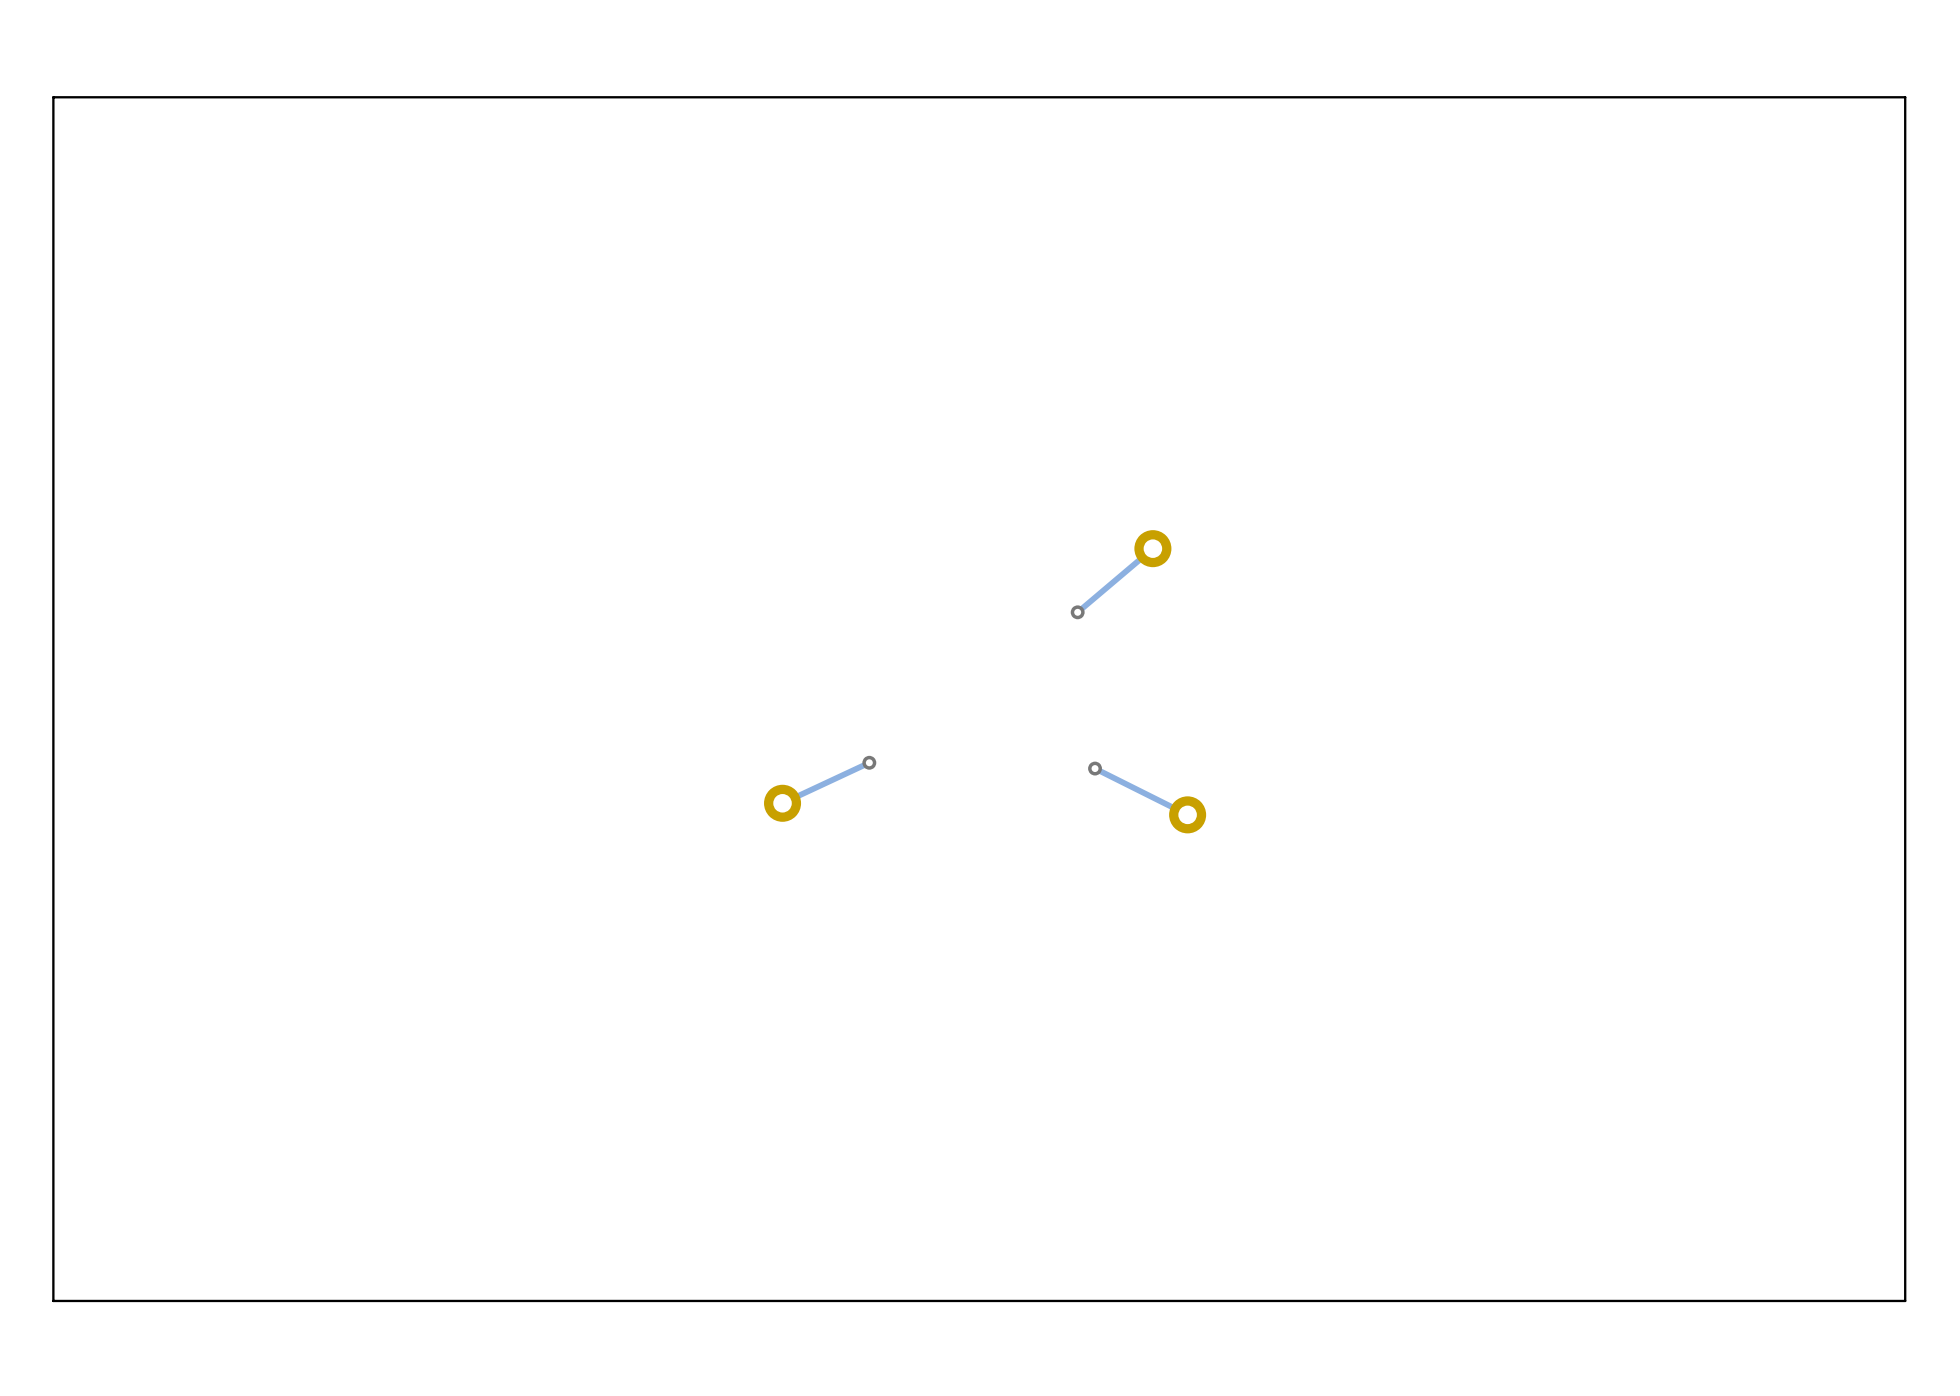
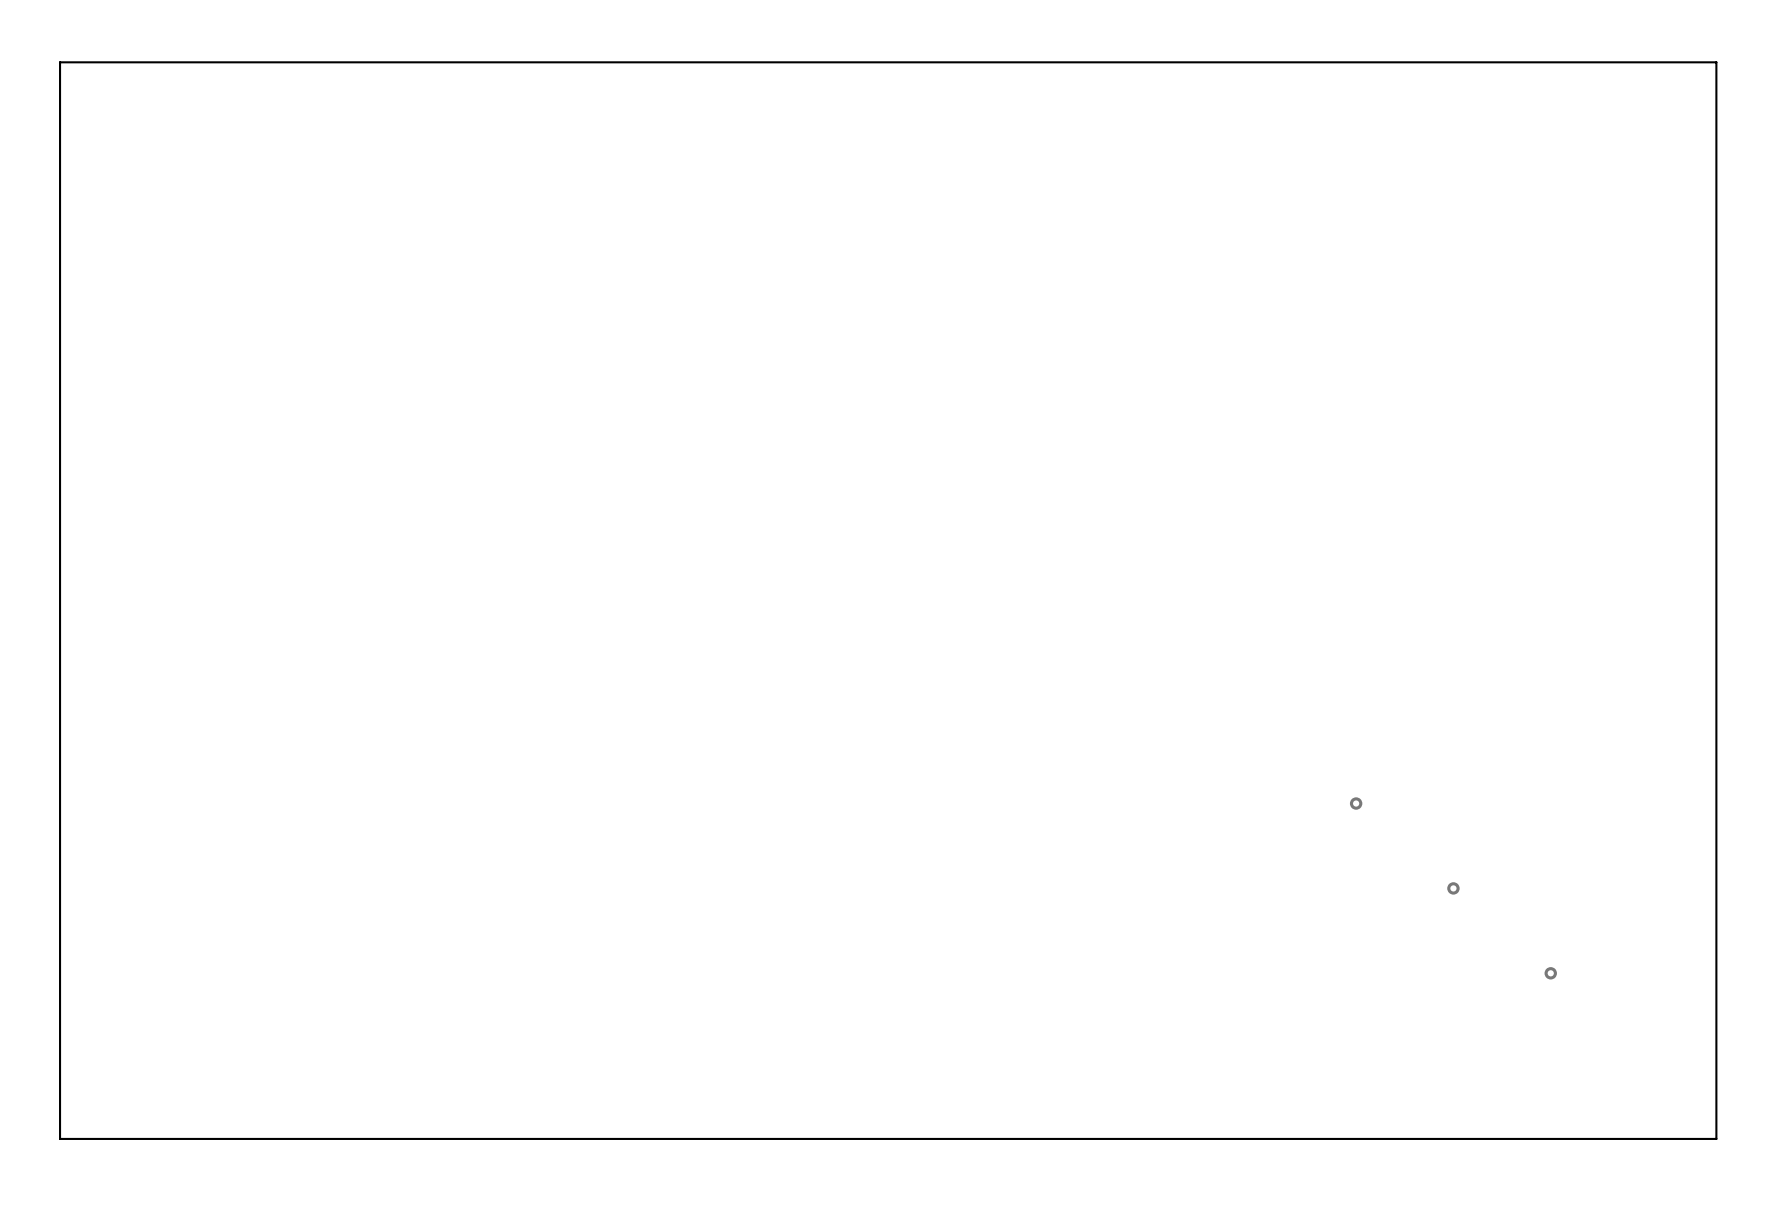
track: (1152, 548) (1077, 612) -> none
part: (1152, 548) -> none
via: (1077, 612) -> none
track: (869, 762) (782, 803) -> none
via: (869, 762) -> none
track: (1095, 768) (1187, 814) -> none
via: (1095, 768) -> none
part: (782, 803) -> none
part: (1187, 814) -> none
via: none -> (1356, 803)
via: none -> (1453, 888)
via: none -> (1550, 973)

